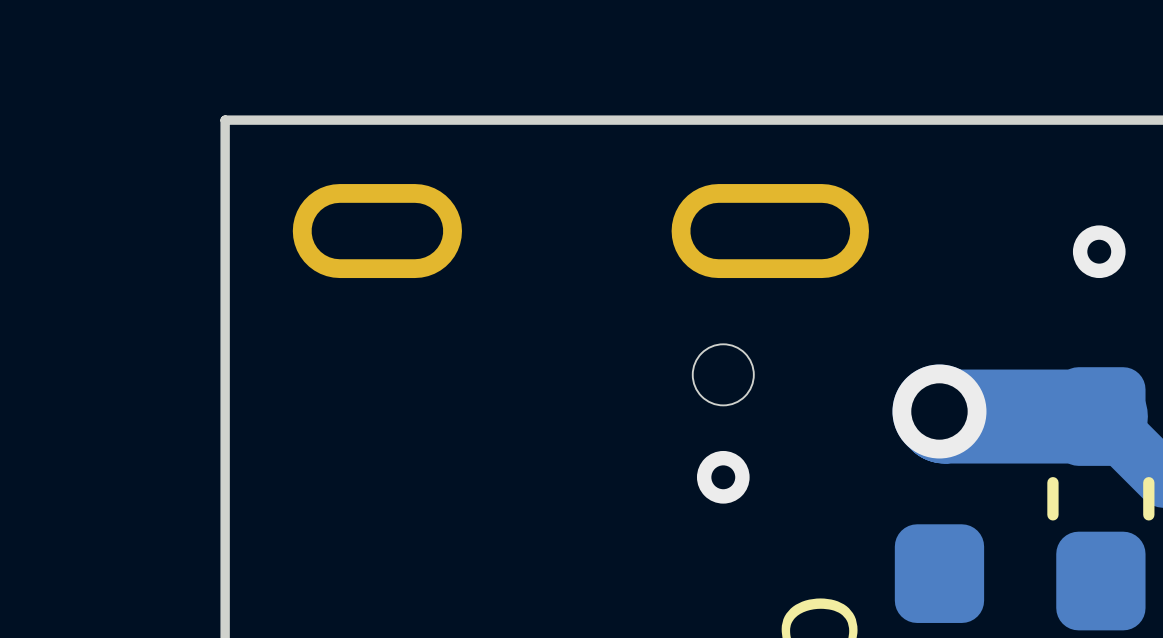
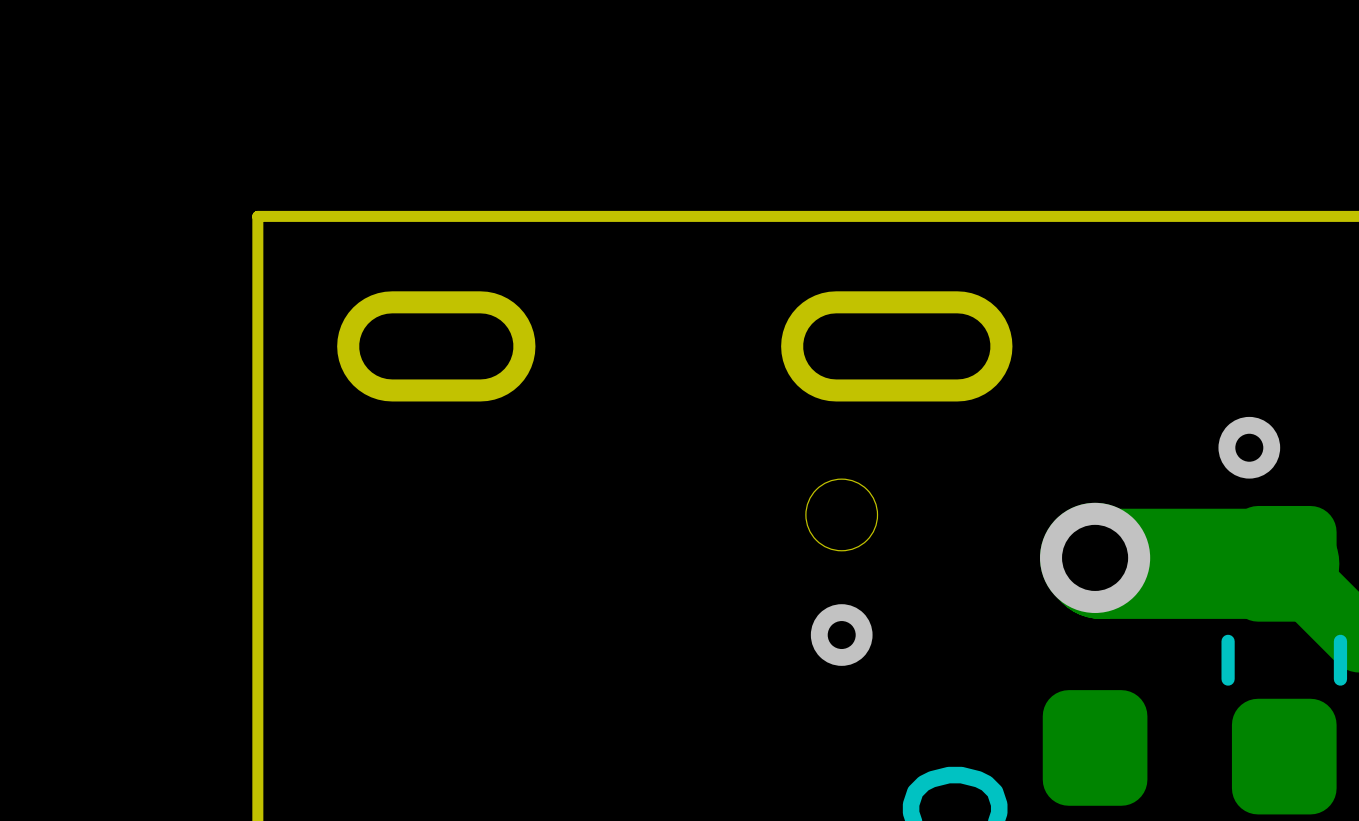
via position: (1099, 251) -> (1249, 447)

